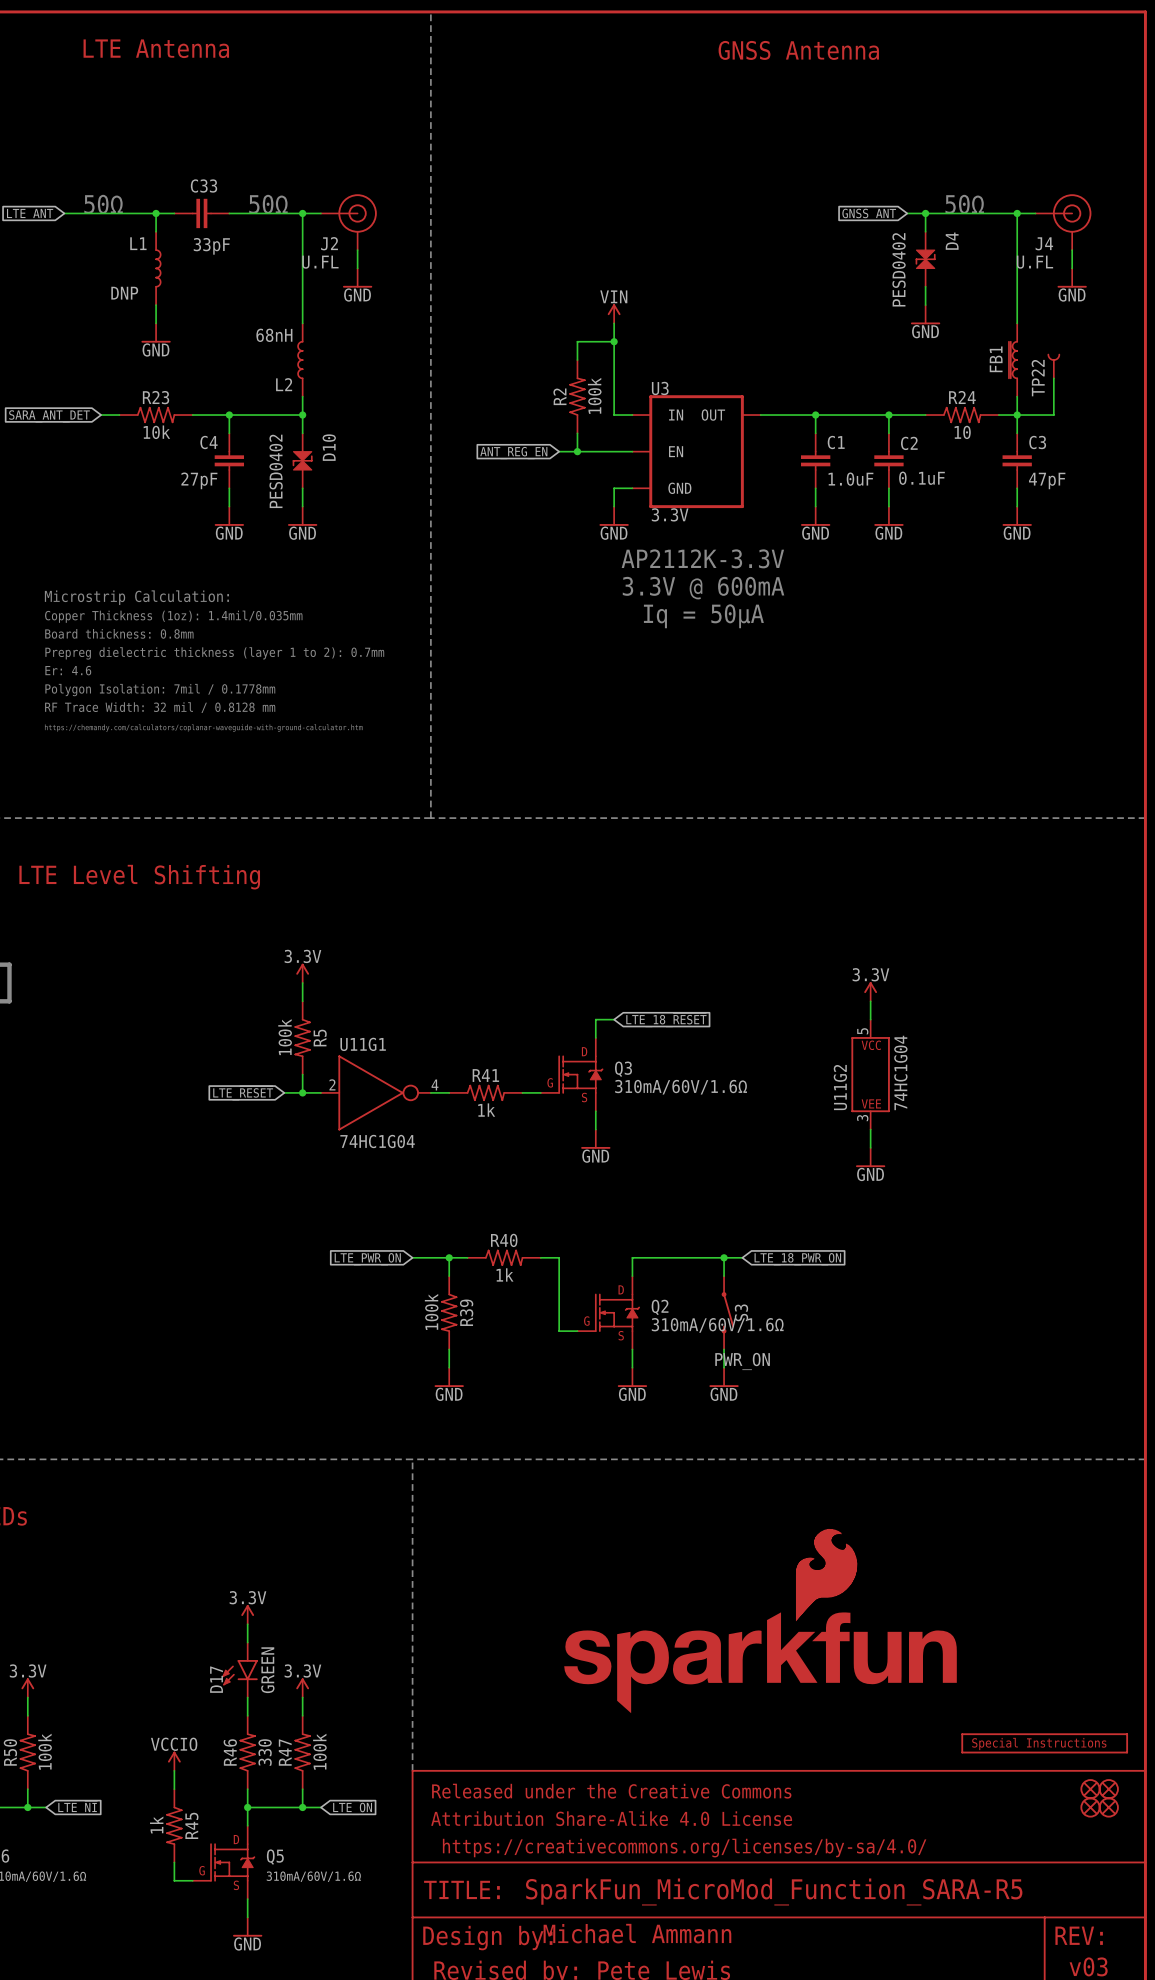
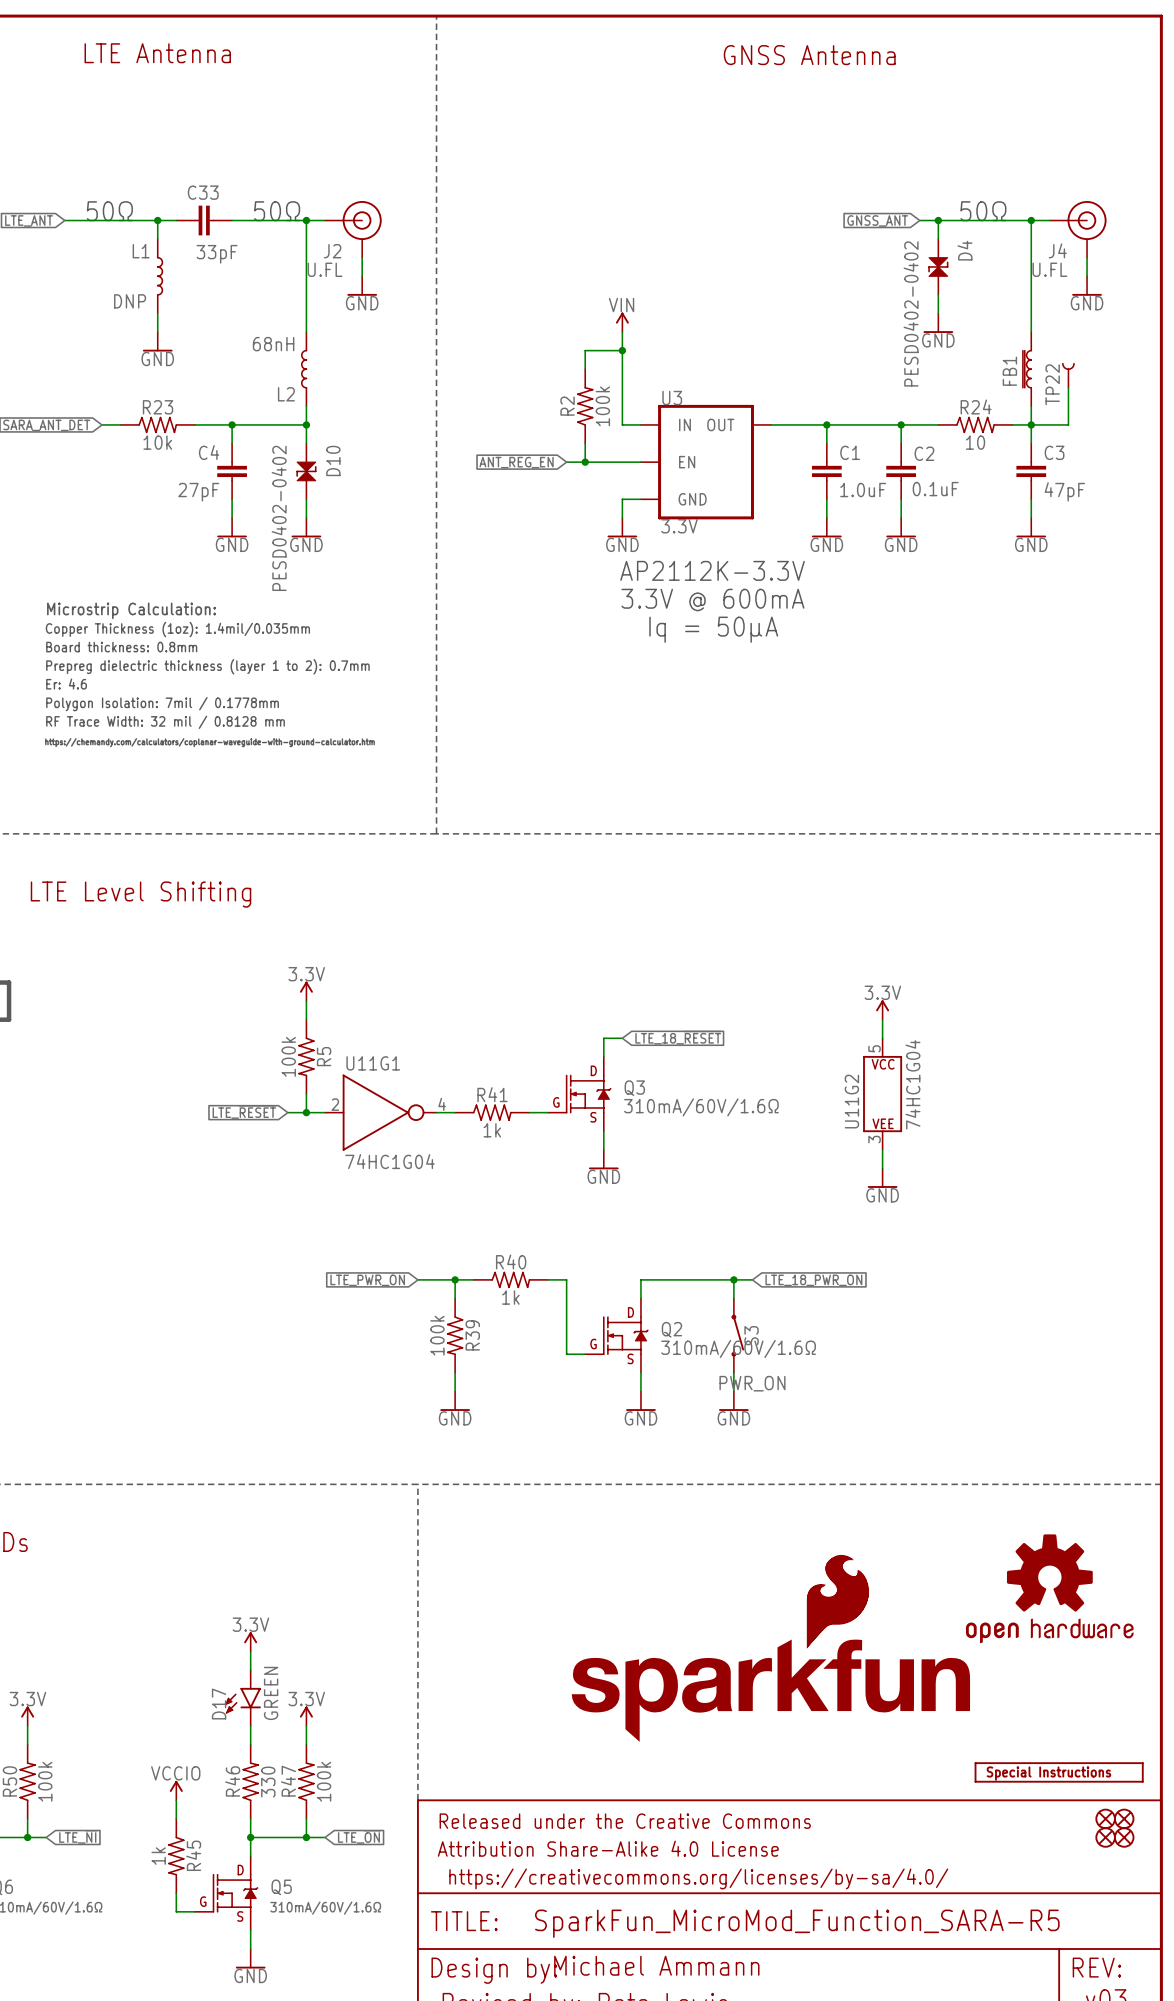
D4 value: PESD0402 (899, 269) -> PESD0402-0402 (911, 313)
D10 value: PESD0402 (276, 471) -> PESD0402-0402 (279, 518)
part: none -> (1049, 1588)

